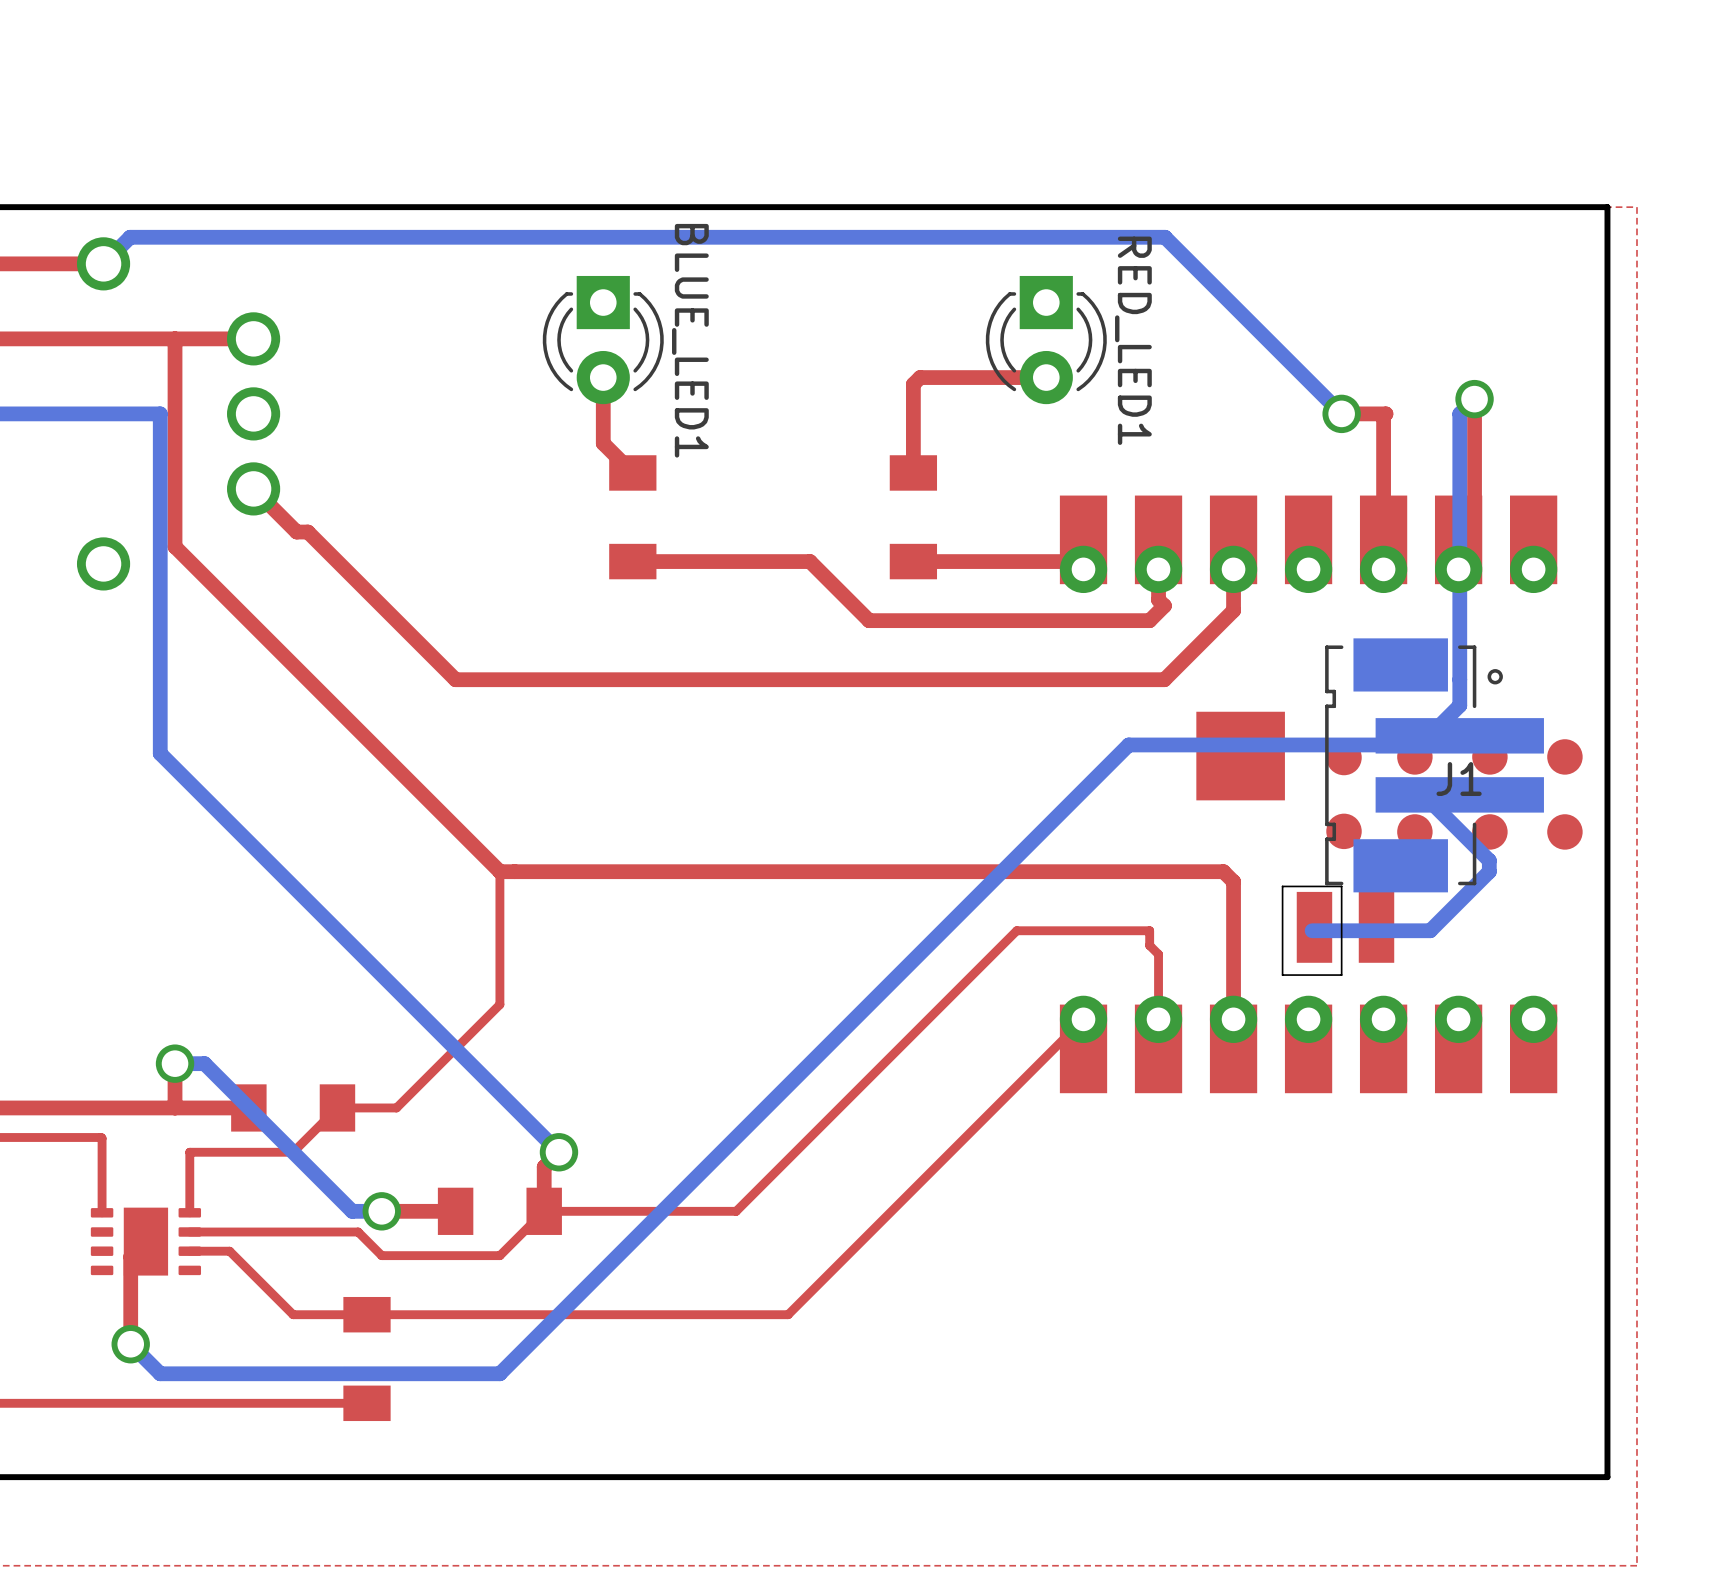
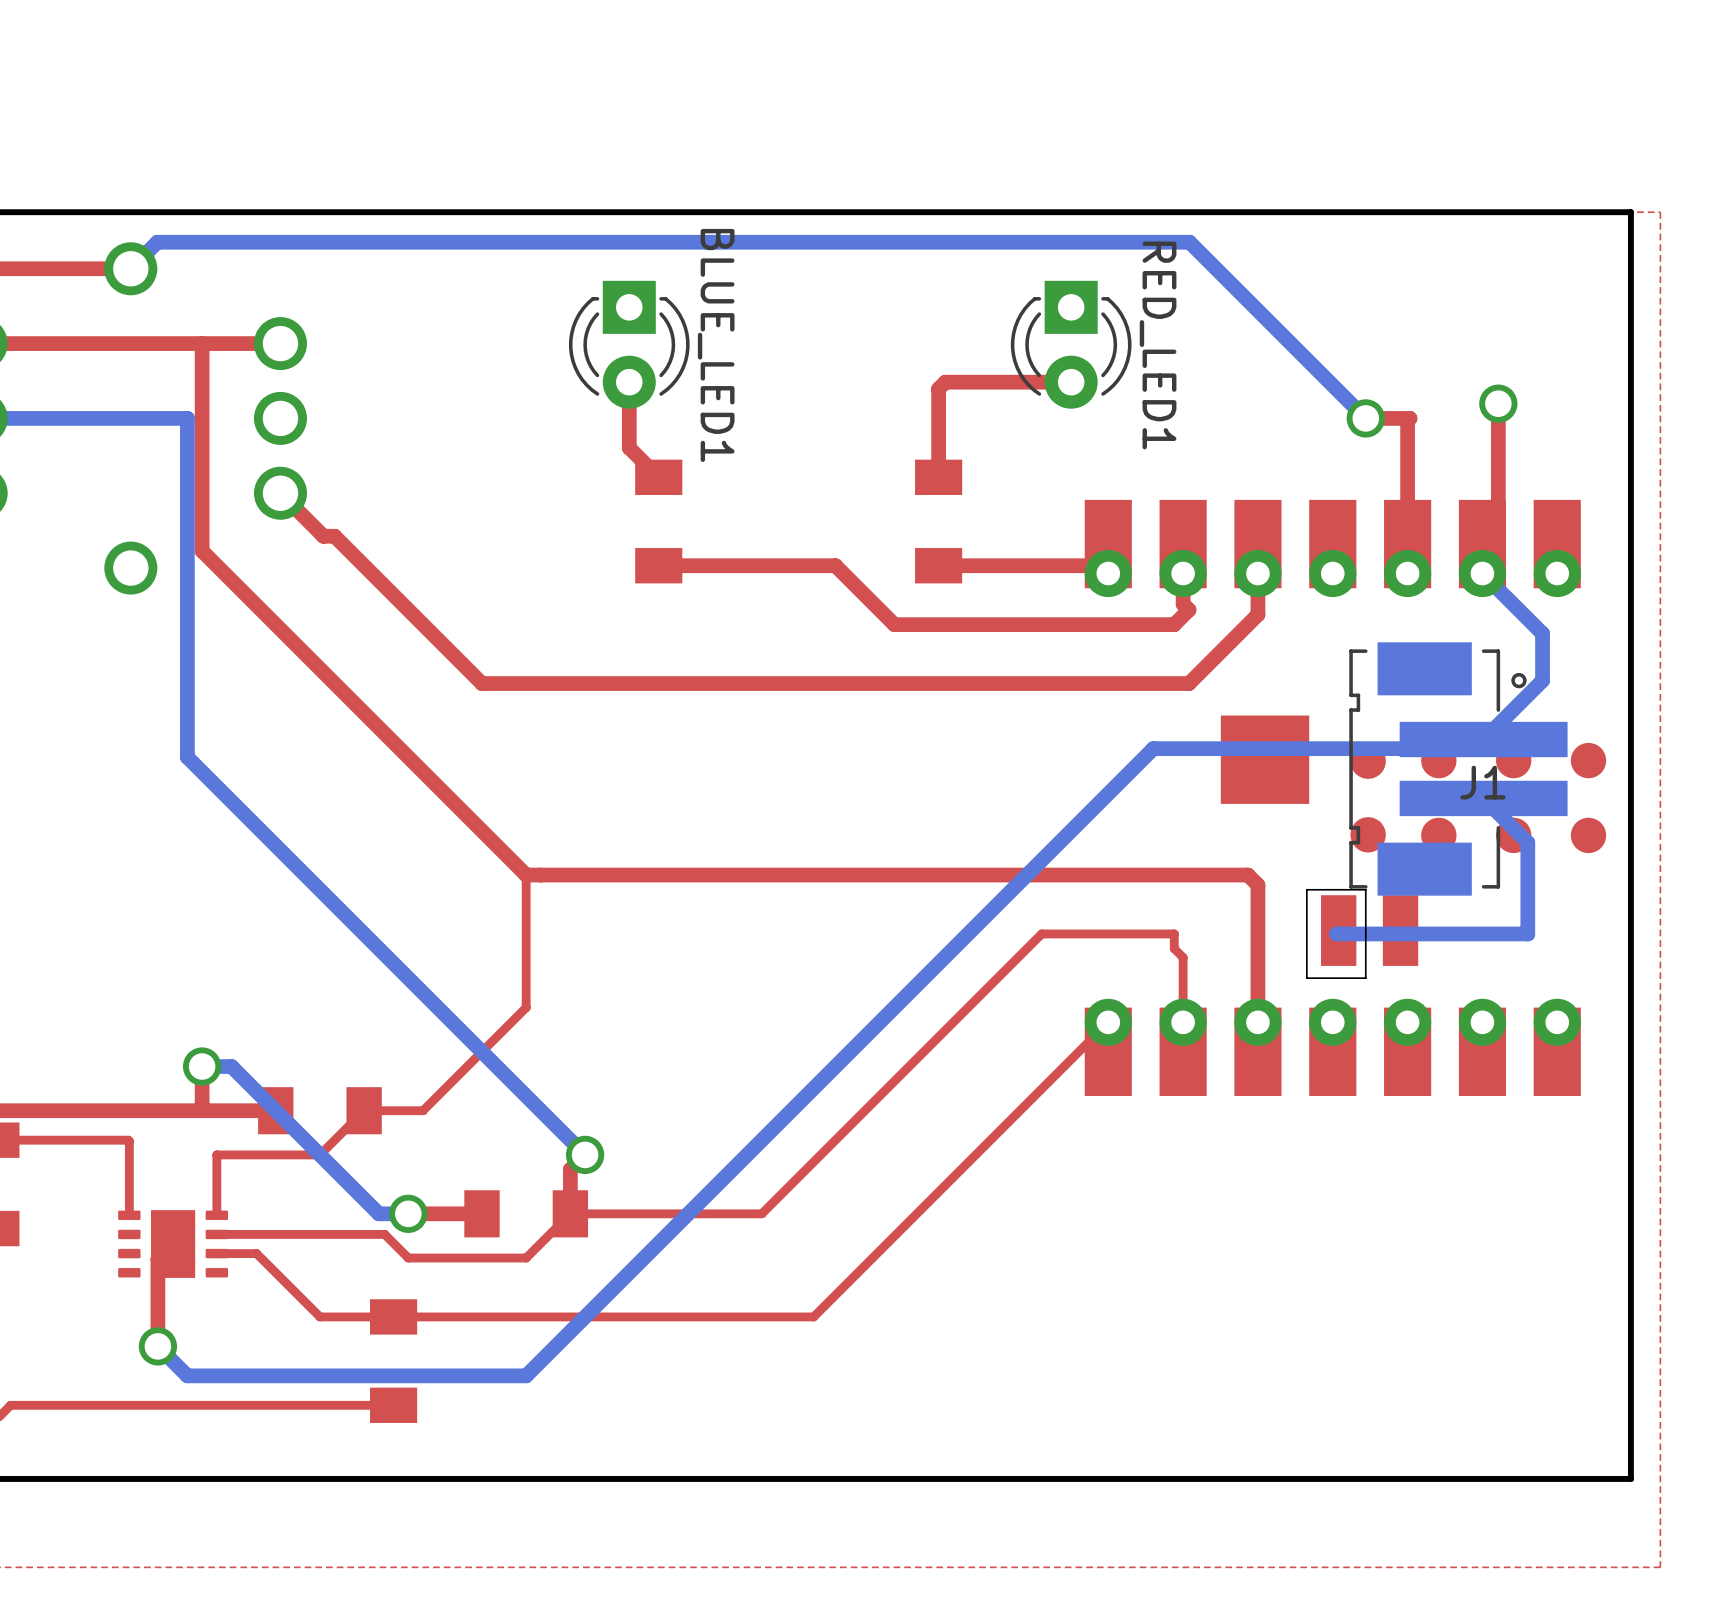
bottom track: (1474, 399) (1459, 413) (1459, 705) (1426, 738) -> none
bottom track: none -> (1482, 573) (1542, 633) (1542, 680) (1483, 739)
bottom track: (1426, 797) (1489, 860) (1489, 871) (1430, 930) -> (1483, 798) (1527, 842) (1527, 933) (1454, 933)

